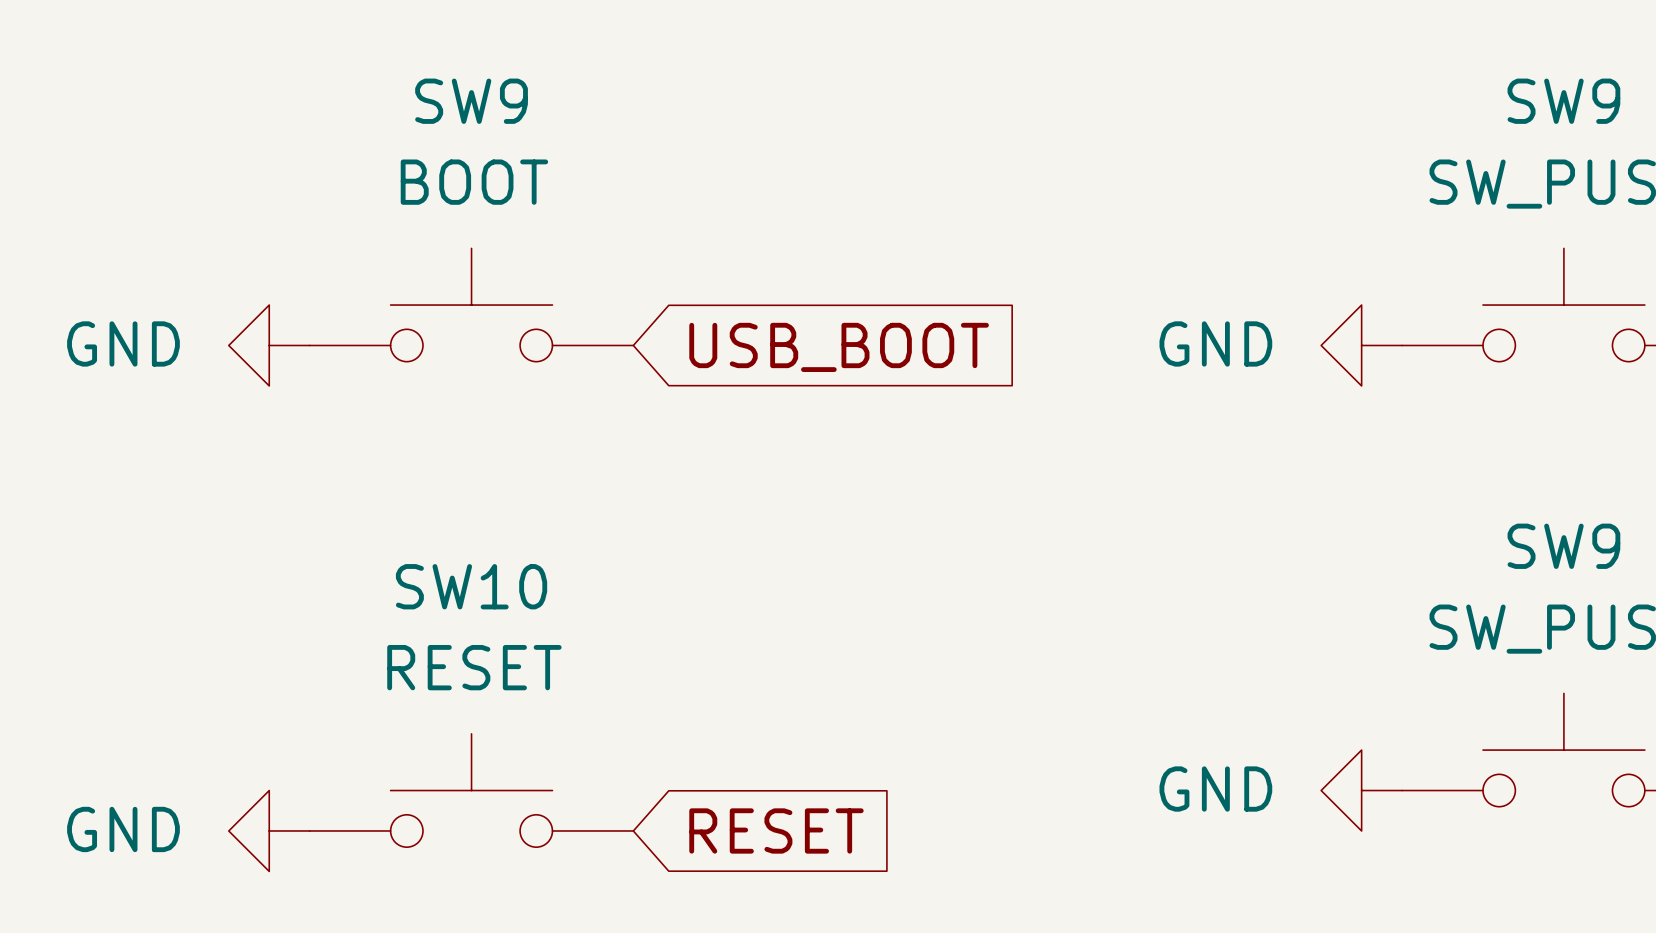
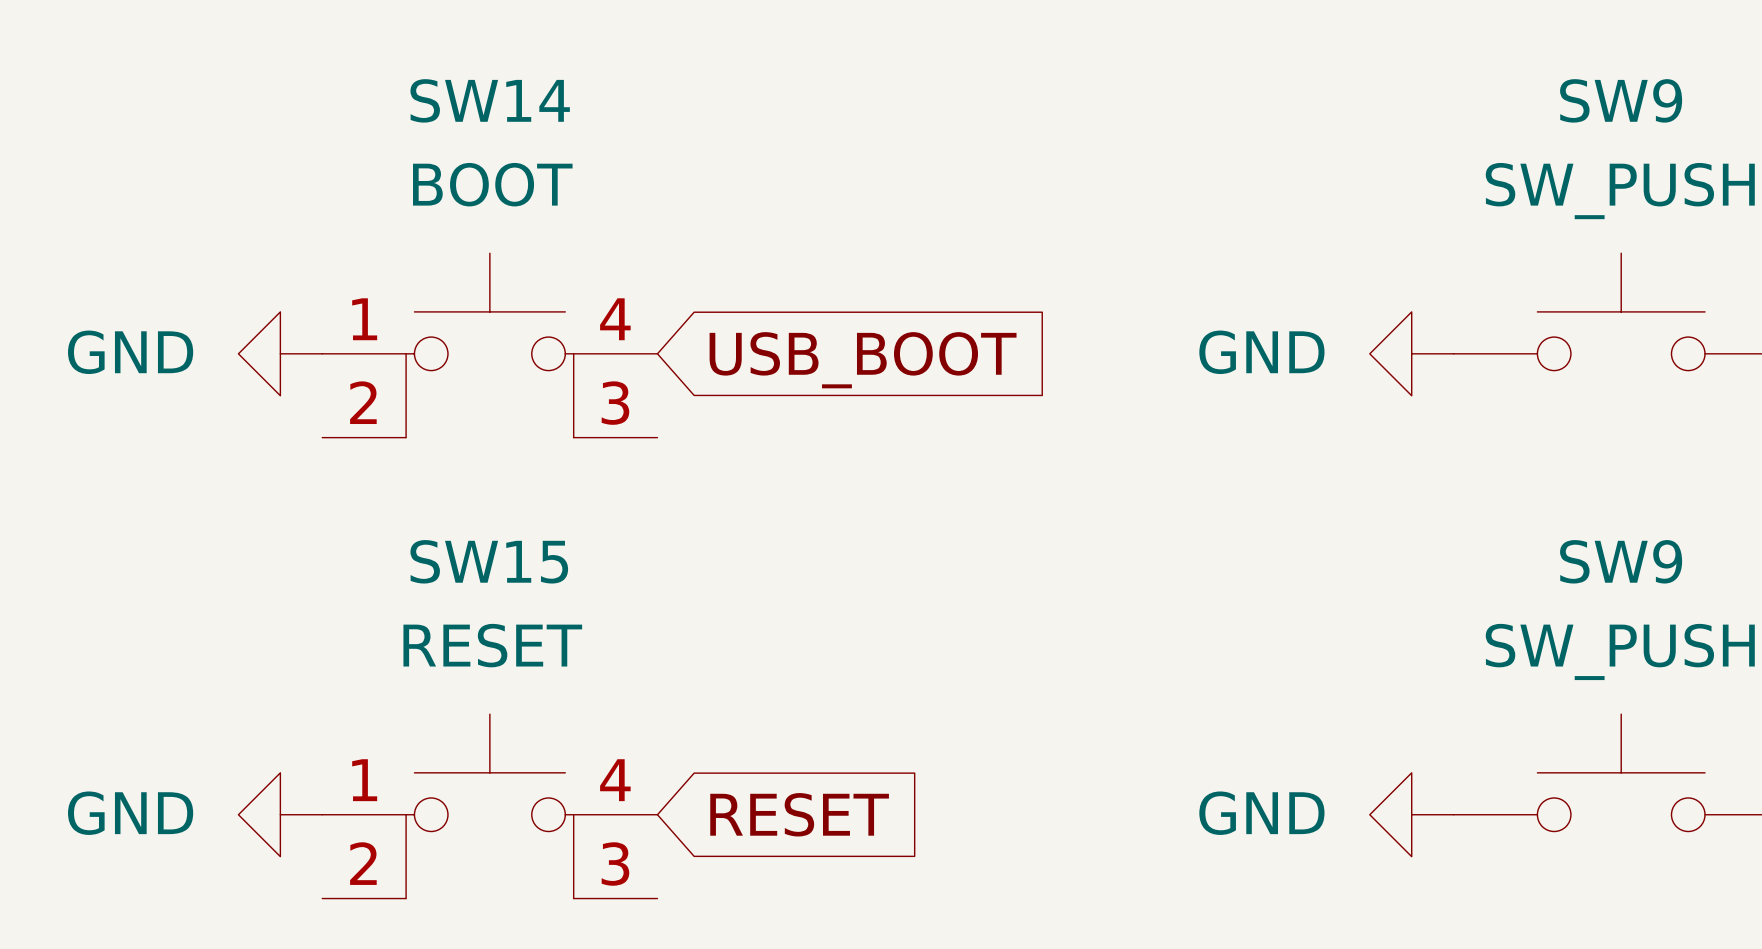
SW9: BOOT (471, 305) -> none
SW14: none -> BOOT (489, 345)
SW15: none -> RESET (489, 806)
SW10: RESET (471, 790) -> none
power symbol position: GND (269, 830) -> GND (280, 814)
global label position: RESET (776, 830) -> RESET (799, 814)

